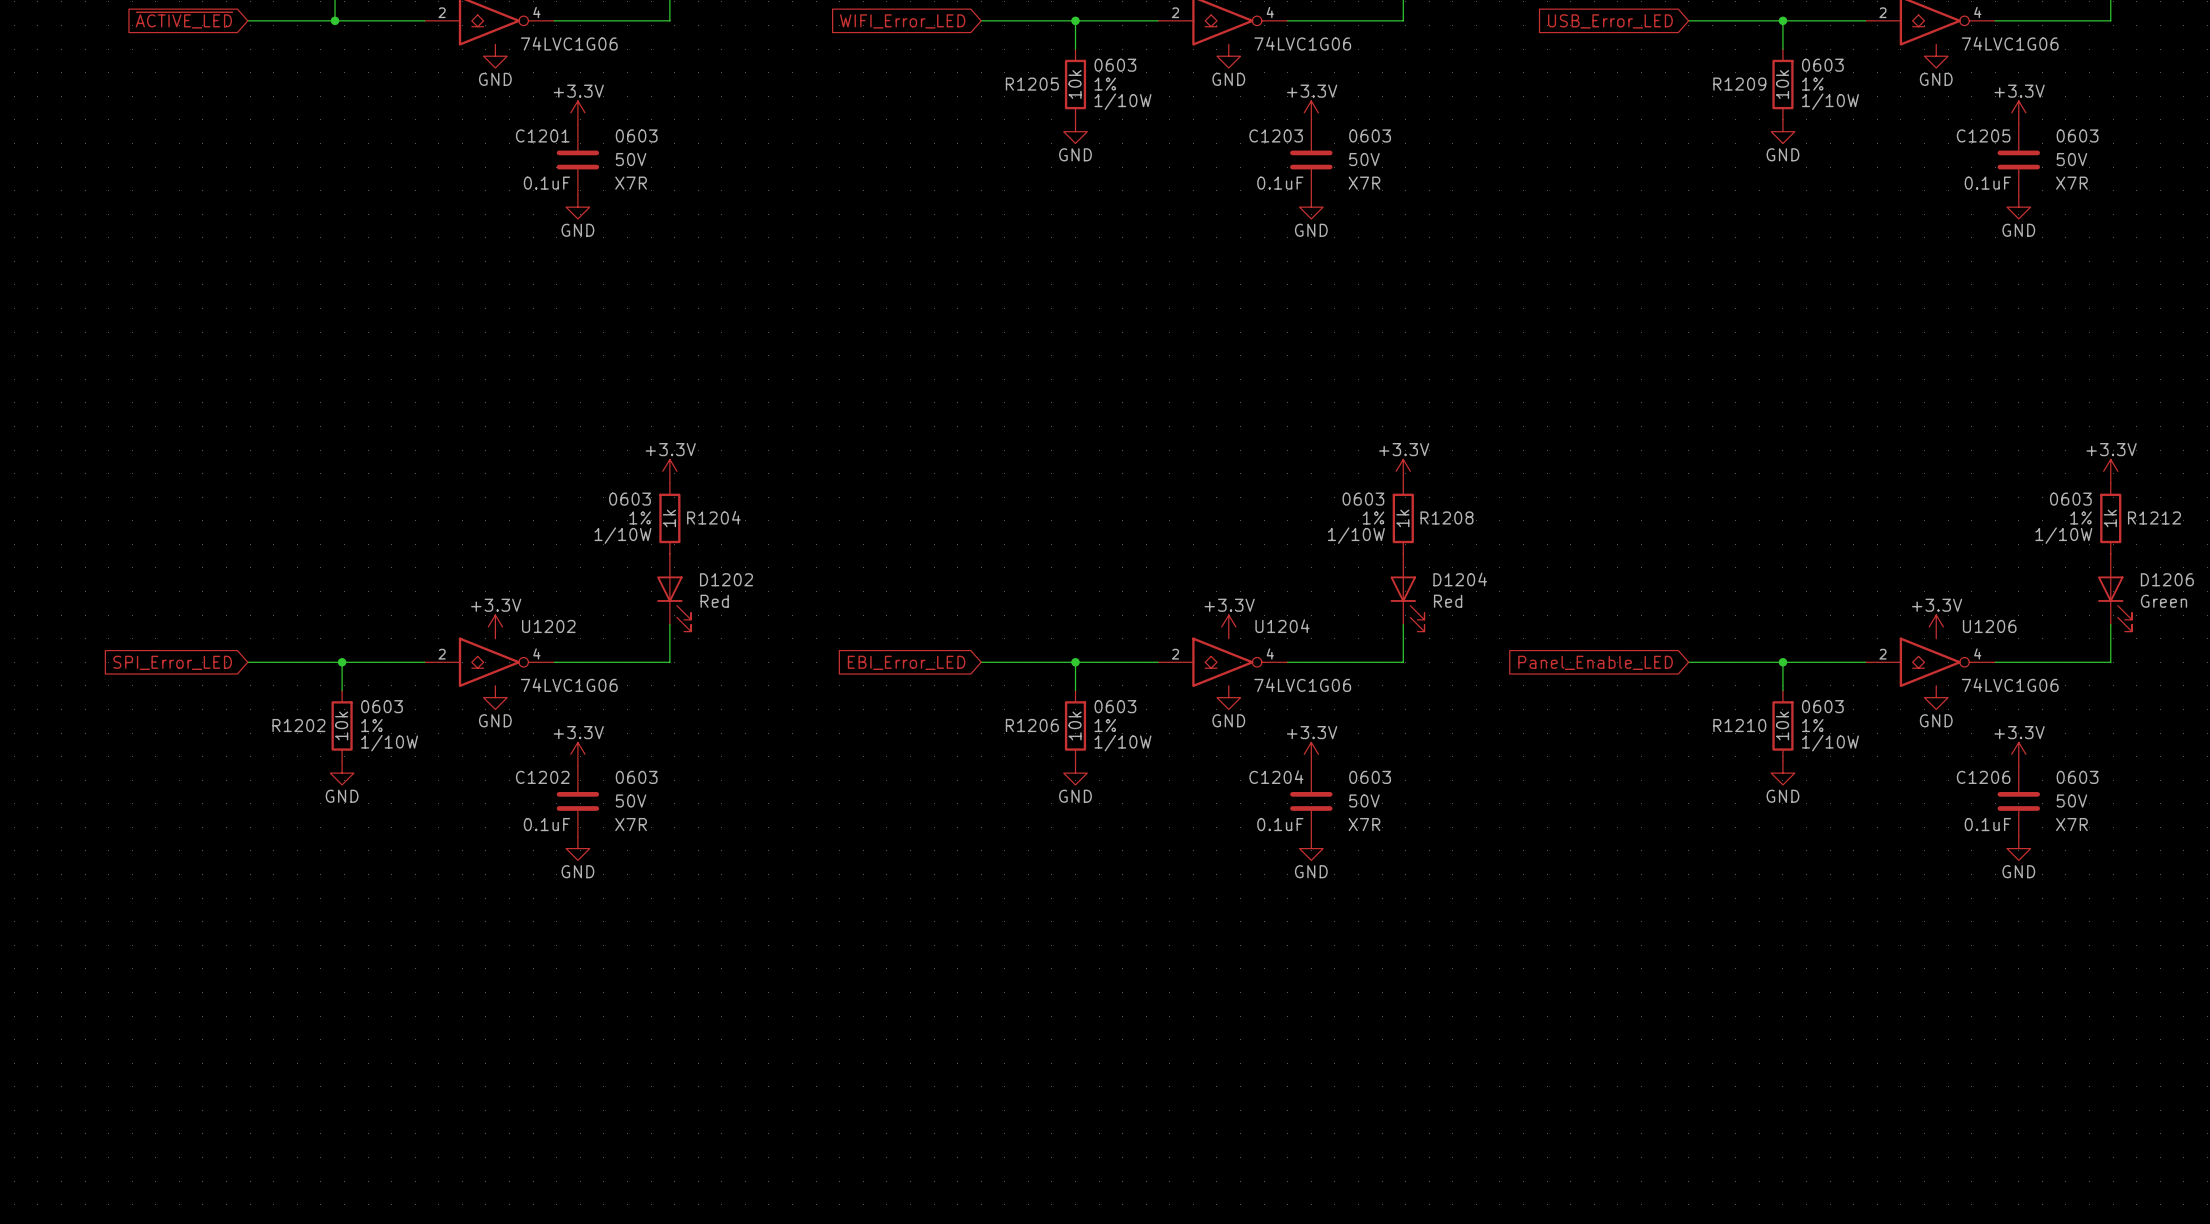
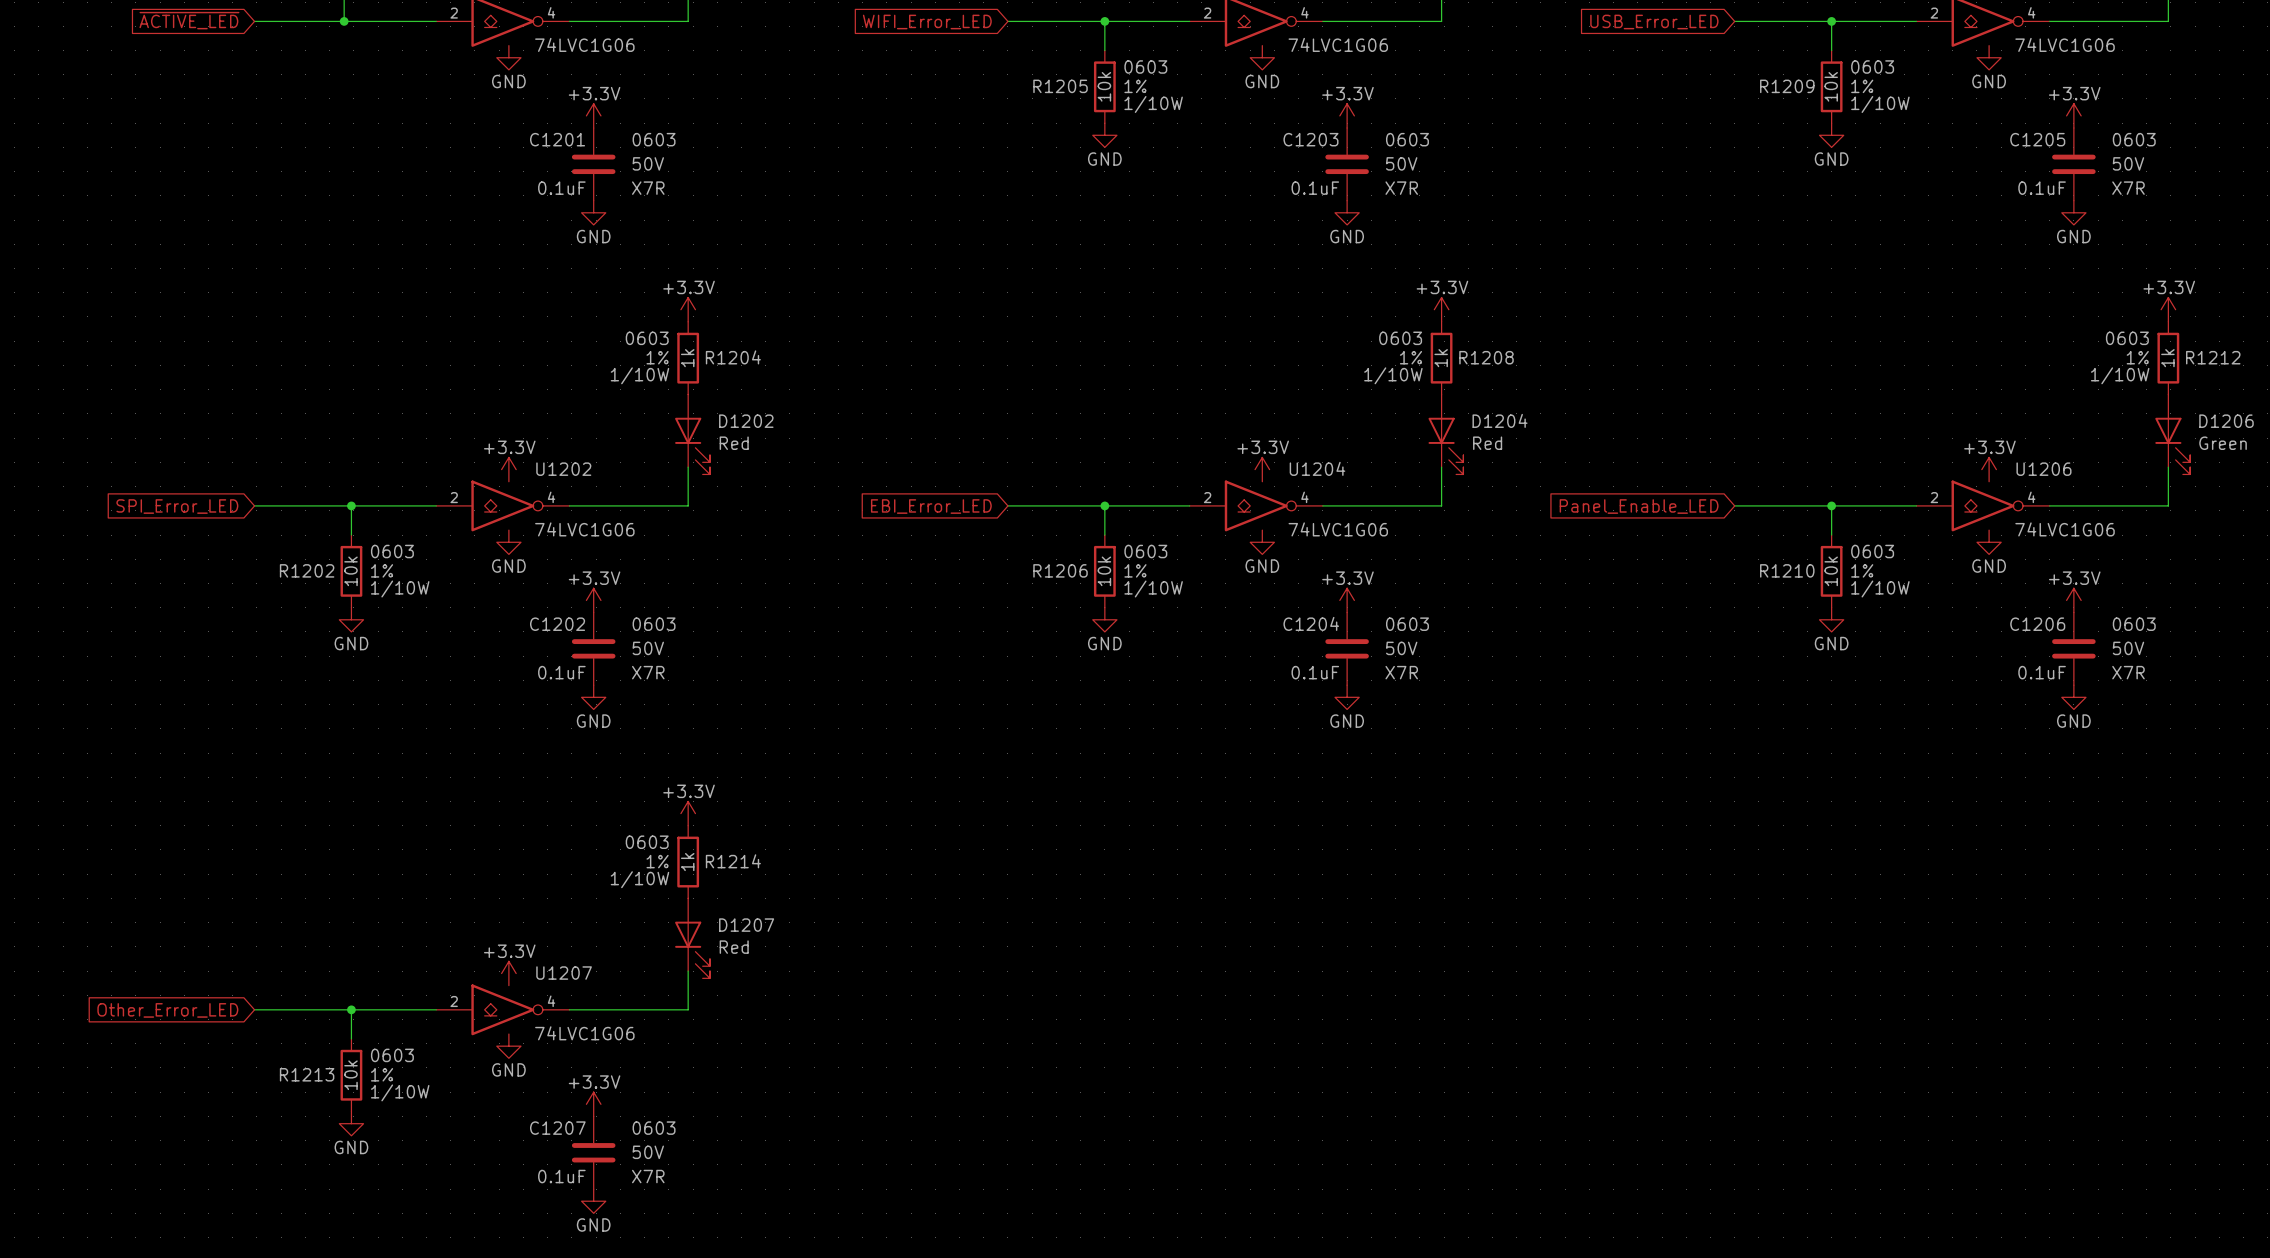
power symbol: none -> +3.3V (688, 309)
power symbol: none -> +3.3V (1441, 309)
power symbol: none -> +3.3V (2168, 309)
power symbol: none -> +3.3V (508, 469)
power symbol: none -> +3.3V (1262, 469)
power symbol: none -> +3.3V (1989, 469)
power symbol: +3.3V (669, 471) -> none
power symbol: +3.3V (1403, 471) -> none
power symbol: +3.3V (2110, 471) -> none
junction: none -> (351, 505)
junction: none -> (1104, 505)
junction: none -> (1831, 505)
R1204 position: (669, 518) -> (688, 358)
R1208 position: (1403, 518) -> (1441, 358)
R1212 position: (2110, 518) -> (2168, 358)
power symbol: none -> GND (508, 542)
power symbol: none -> GND (1262, 542)
power symbol: none -> GND (1989, 542)
power symbol: none -> +3.3V (593, 600)
power symbol: none -> +3.3V (1347, 600)
power symbol: none -> +3.3V (2073, 600)
D1202 position: (674, 592) -> (692, 434)
D1204 position: (1407, 592) -> (1445, 434)
D1206 position: (2115, 592) -> (2172, 434)
power symbol: none -> GND (351, 619)
power symbol: none -> GND (1104, 619)
power symbol: none -> GND (1831, 619)
wire: (669, 624) (669, 662) (554, 662) -> (688, 467) (688, 505) (569, 505)
wire: (1403, 624) (1403, 662) (1287, 662) -> (1441, 467) (1441, 505) (1322, 505)
wire: (2110, 624) (2110, 662) (1995, 662) -> (2168, 467) (2168, 505) (2049, 505)
power symbol: +3.3V (495, 626) -> none
power symbol: +3.3V (1228, 626) -> none
power symbol: +3.3V (1936, 626) -> none
global label position: SPI_Error_LED (172, 662) -> SPI_Error_LED (177, 506)
wire: (247, 662) (424, 662) -> (254, 505) (436, 505)
wire: (342, 662) (342, 690) -> (351, 505) (351, 535)
junction: (342, 662) -> none
U1202 position: (489, 662) -> (502, 505)
global label position: EBI_Error_LED (906, 662) -> EBI_Error_LED (931, 506)
wire: (981, 662) (1158, 662) -> (1007, 505) (1189, 505)
wire: (1075, 662) (1075, 690) -> (1104, 505) (1104, 535)
junction: (1075, 662) -> none
U1204 position: (1222, 662) -> (1256, 505)
global label position: Panel_Enable_LED (1595, 662) -> Panel_Enable_LED (1639, 506)
wire: (1688, 662) (1865, 662) -> (1734, 505) (1916, 505)
wire: (1782, 662) (1782, 690) -> (1831, 505) (1831, 535)
junction: (1782, 662) -> none
U1206 position: (1930, 662) -> (1983, 505)
power symbol position: GND (495, 697) -> GND (593, 697)
power symbol position: GND (1228, 697) -> GND (1347, 697)
power symbol position: GND (1936, 697) -> GND (2073, 697)
R1202 position: (342, 725) -> (351, 571)
R1206 position: (1075, 725) -> (1104, 571)
R1210 position: (1782, 725) -> (1831, 571)
power symbol: +3.3V (577, 754) -> none
power symbol: +3.3V (1311, 754) -> none
power symbol: +3.3V (2018, 754) -> none
power symbol: GND (342, 773) -> none
power symbol: GND (1075, 773) -> none
power symbol: GND (1782, 773) -> none
power symbol: none -> +3.3V (688, 813)
C1202 position: (577, 801) -> (593, 648)
C1204 position: (1311, 801) -> (1347, 648)
C1206 position: (2018, 801) -> (2073, 648)
R1214: none -> 1k (688, 862)
power symbol: GND (577, 848) -> none
power symbol: GND (1311, 848) -> none
power symbol: GND (2018, 848) -> none
D1207: none -> Red (692, 938)
wire: none -> (688, 971) (688, 1009) (569, 1009)
power symbol: none -> +3.3V (508, 973)
global label: none -> Other_Error_LED (167, 1010)
wire: none -> (254, 1009) (436, 1009)
wire: none -> (351, 1009) (351, 1038)
junction: none -> (351, 1009)
U1207: none -> 74LVC1G06 (502, 1009)
power symbol: none -> GND (508, 1046)
R1213: none -> 10k (351, 1075)
power symbol: none -> +3.3V (593, 1104)
power symbol: none -> GND (351, 1123)
C1207: none -> 0.1uF (593, 1152)
power symbol: none -> GND (593, 1201)

